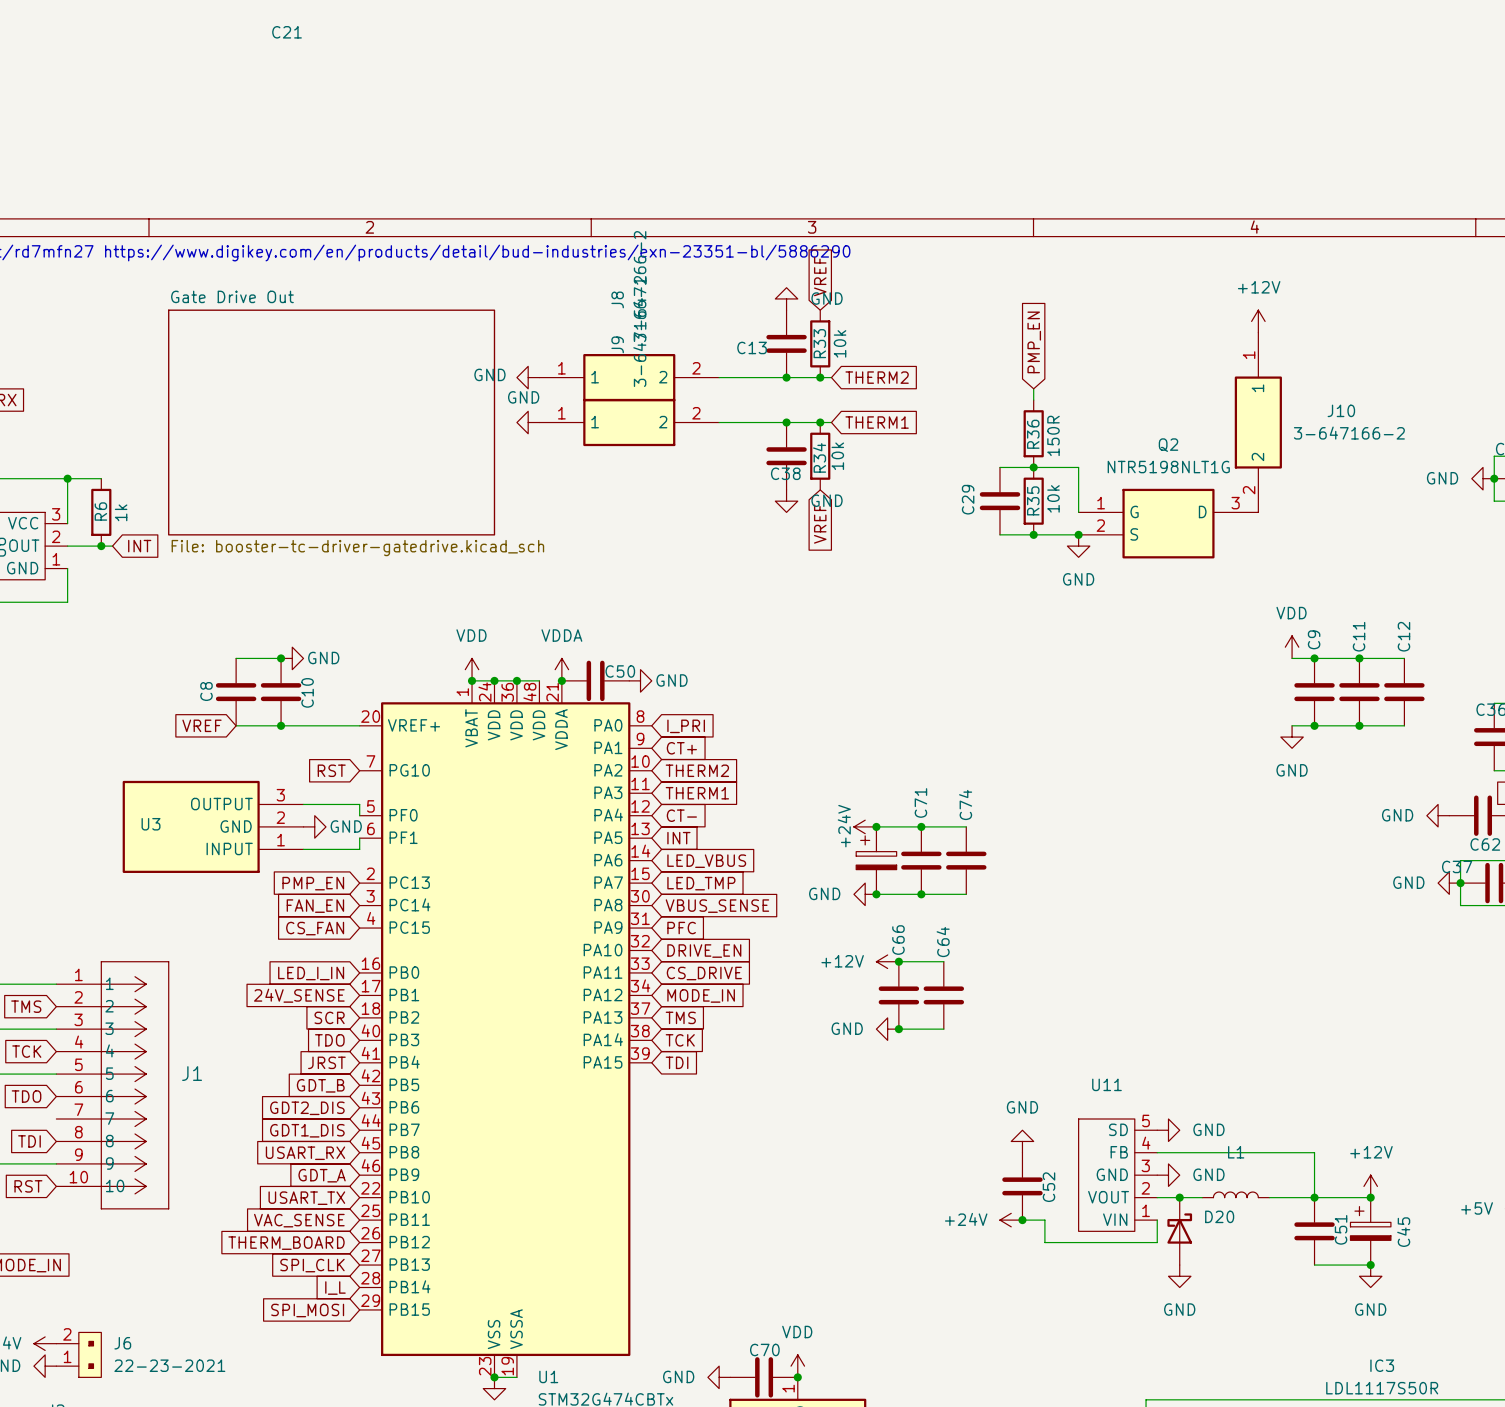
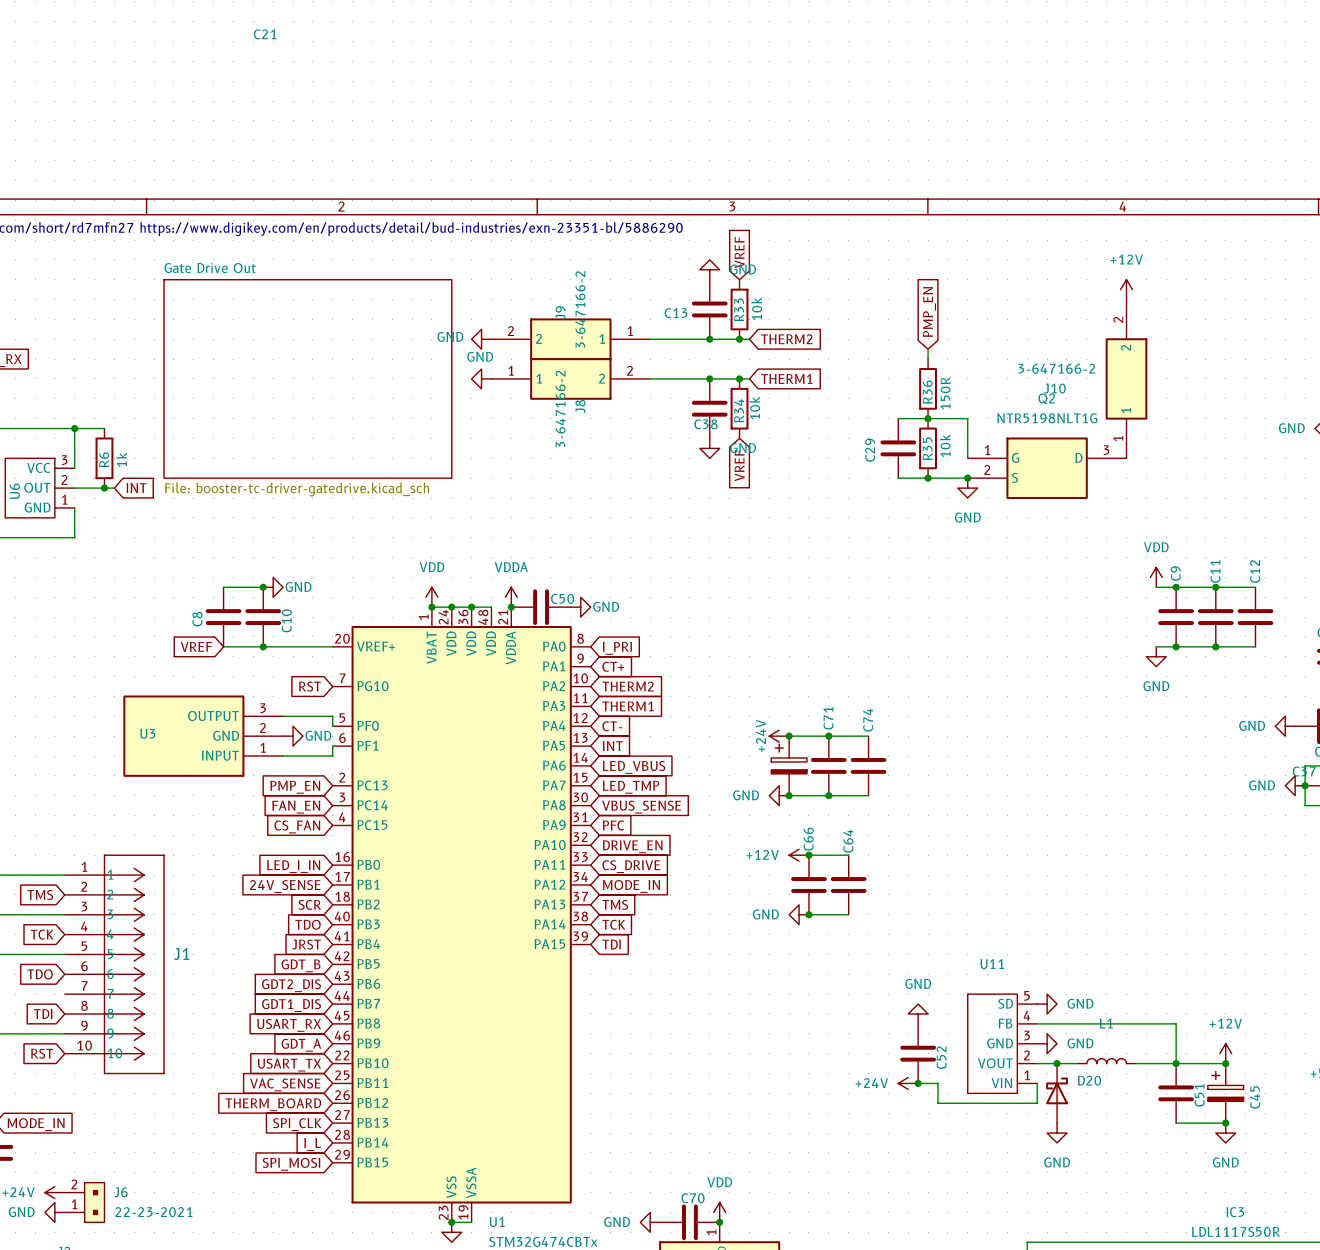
J8 rotation: 0° (629, 377) -> 180° (570, 339)
J10 rotation: 0° (1258, 422) -> 180° (1126, 378)

